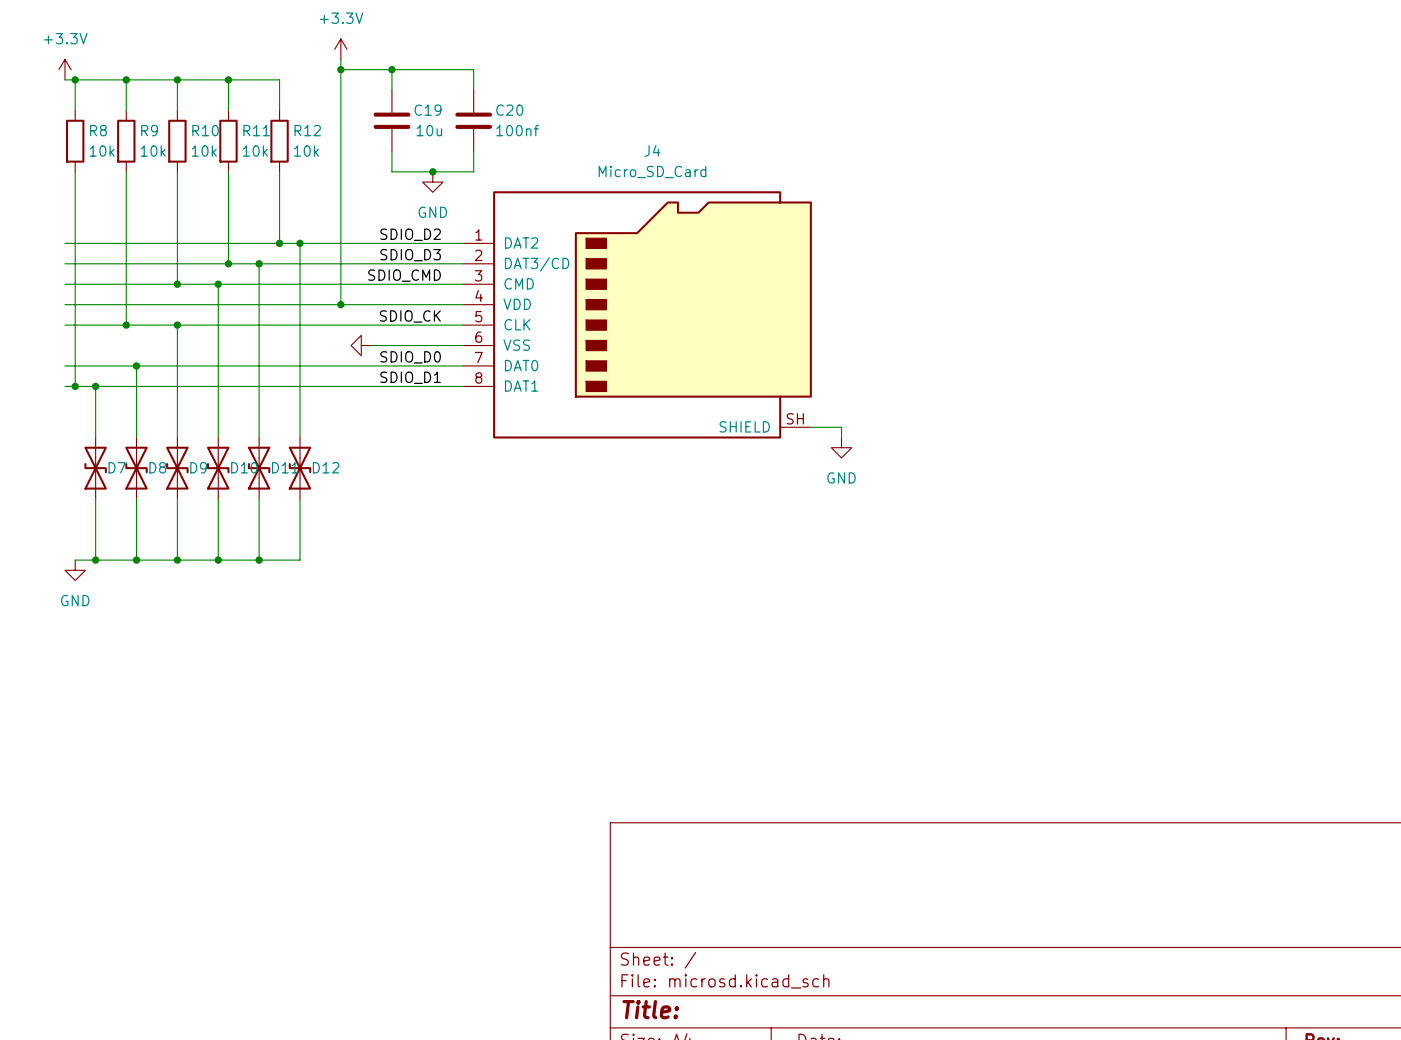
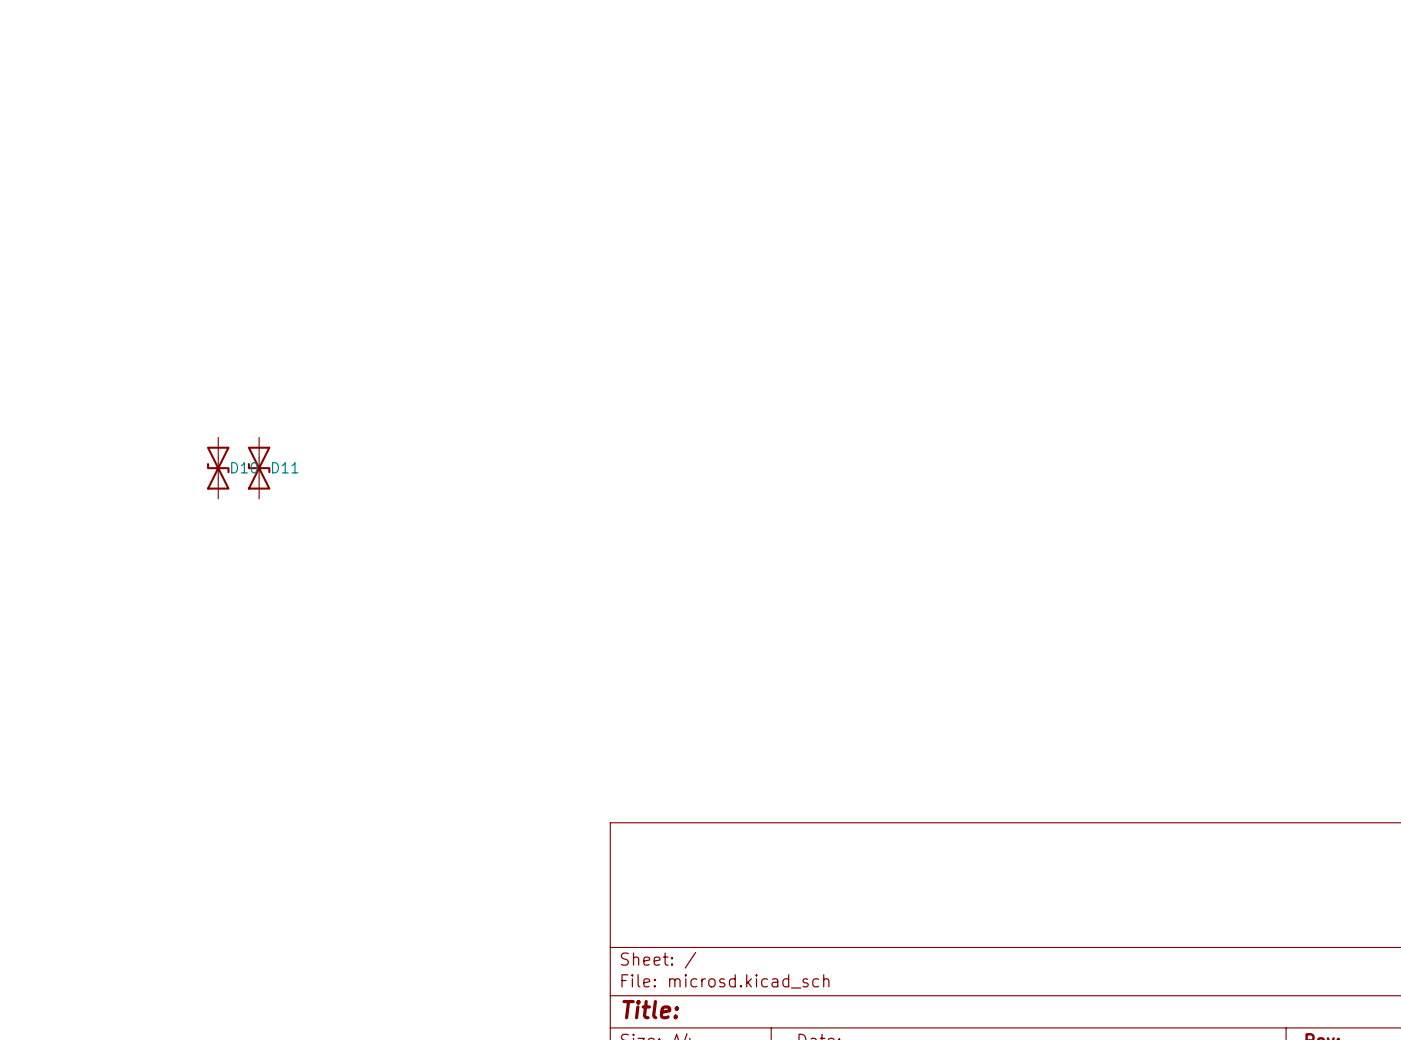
power symbol: +3.3V (340, 49) -> none
wire: (340, 59) (340, 304) -> none
power symbol: +3.3V (64, 69) -> none
wire: (340, 69) (473, 69) (473, 90) -> none
junction: (340, 69) -> none
wire: (391, 69) (391, 90) -> none
junction: (391, 69) -> none
wire: (64, 79) (279, 79) (279, 110) -> none
wire: (75, 79) (75, 110) -> none
junction: (75, 79) -> none
wire: (126, 79) (126, 110) -> none
junction: (126, 79) -> none
wire: (177, 79) (177, 110) -> none
junction: (177, 79) -> none
wire: (228, 79) (228, 110) -> none
junction: (228, 79) -> none
C19: 10u (391, 120) -> none
C20: 100nf (473, 120) -> none
R8: 10k (75, 141) -> none
R9: 10k (126, 141) -> none
R10: 10k (177, 141) -> none
R11: 10k (228, 141) -> none
R12: 10k (279, 141) -> none
wire: (391, 151) (391, 171) (473, 171) (473, 151) -> none
wire: (75, 171) (75, 386) -> none
wire: (126, 171) (126, 325) -> none
wire: (177, 171) (177, 284) -> none
wire: (228, 171) (228, 263) -> none
wire: (279, 171) (279, 243) -> none
junction: (432, 171) -> none
power symbol: GND (432, 182) -> none
label: SDIO_D2 (410, 234) -> none
wire: (64, 243) (463, 243) -> none
junction: (279, 243) -> none
wire: (299, 243) (299, 437) -> none
junction: (299, 243) -> none
label: SDIO_D3 (410, 255) -> none
wire: (64, 263) (463, 263) -> none
junction: (228, 263) -> none
wire: (259, 263) (259, 437) -> none
junction: (259, 263) -> none
label: SDIO_CMD (404, 275) -> none
wire: (64, 284) (463, 284) -> none
junction: (177, 284) -> none
wire: (218, 284) (218, 437) -> none
junction: (218, 284) -> none
wire: (64, 304) (463, 304) -> none
junction: (340, 304) -> none
J4: Micro_SD_Card (637, 314) -> none
label: SDIO_CK (410, 316) -> none
wire: (64, 325) (463, 325) -> none
junction: (126, 325) -> none
wire: (177, 325) (177, 437) -> none
junction: (177, 325) -> none
power symbol: (361, 345) -> none
wire: (371, 345) (463, 345) -> none
label: SDIO_D0 (410, 357) -> none
wire: (64, 365) (463, 365) -> none
wire: (136, 365) (136, 437) -> none
junction: (136, 365) -> none
label: SDIO_D1 (410, 377) -> none
wire: (64, 386) (463, 386) -> none
junction: (75, 386) -> none
wire: (95, 386) (95, 437) -> none
junction: (95, 386) -> none
wire: (810, 427) (841, 427) (841, 437) -> none
power symbol: GND (841, 447) -> none
D7: (95, 468) -> none
D8: (136, 468) -> none
D9: (177, 468) -> none
D12: (299, 468) -> none
wire: (95, 498) (95, 560) -> none
wire: (136, 498) (136, 560) -> none
wire: (177, 498) (177, 560) -> none
wire: (218, 498) (218, 560) -> none
wire: (259, 498) (259, 560) -> none
wire: (299, 498) (299, 560) (75, 560) -> none
junction: (95, 560) -> none
junction: (136, 560) -> none
junction: (177, 560) -> none
junction: (218, 560) -> none
junction: (259, 560) -> none
power symbol: GND (75, 570) -> none

